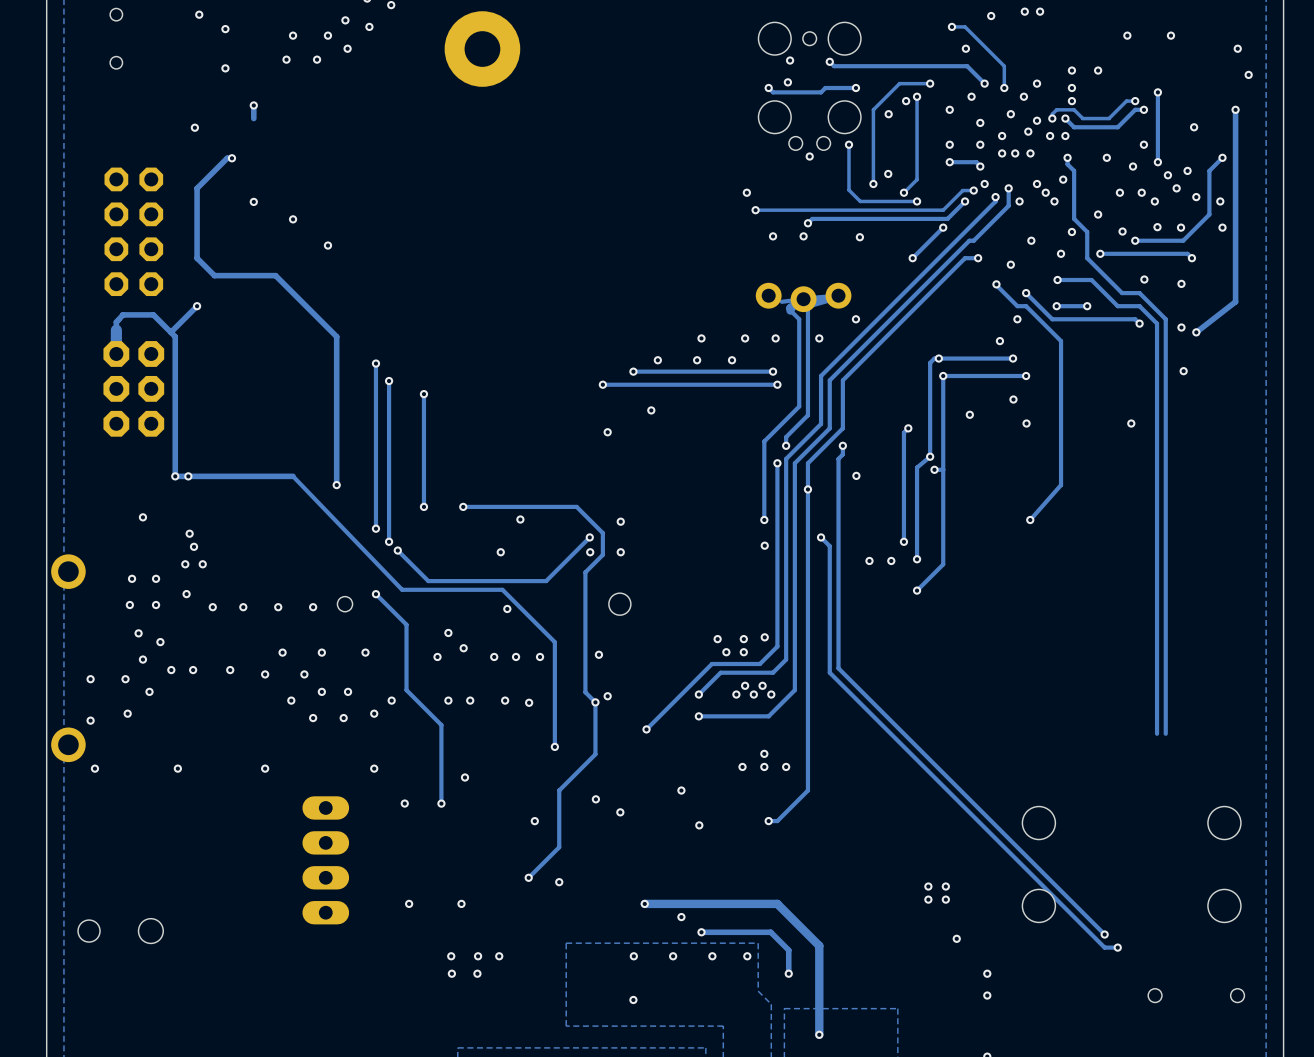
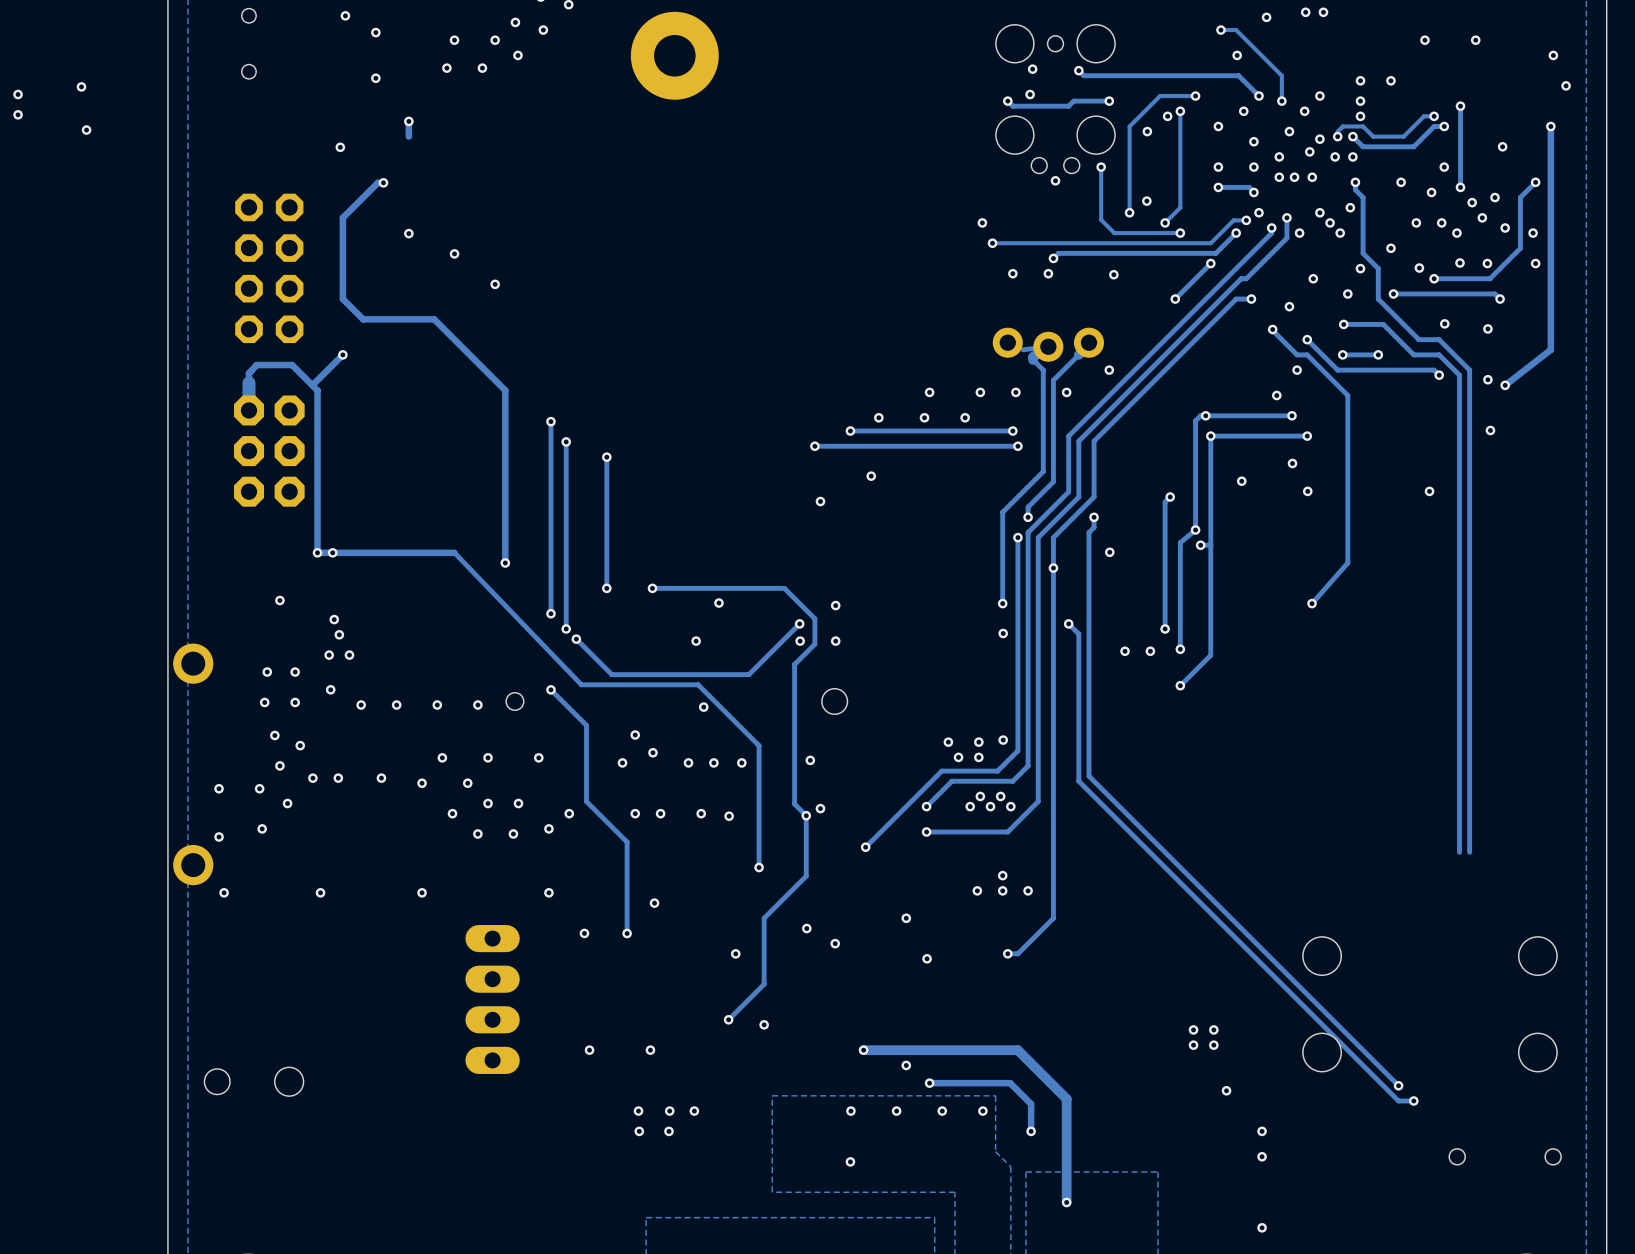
track: (816, 297) (838, 295) (807, 304) (807, 328) -> (1088, 342) (1053, 380)

